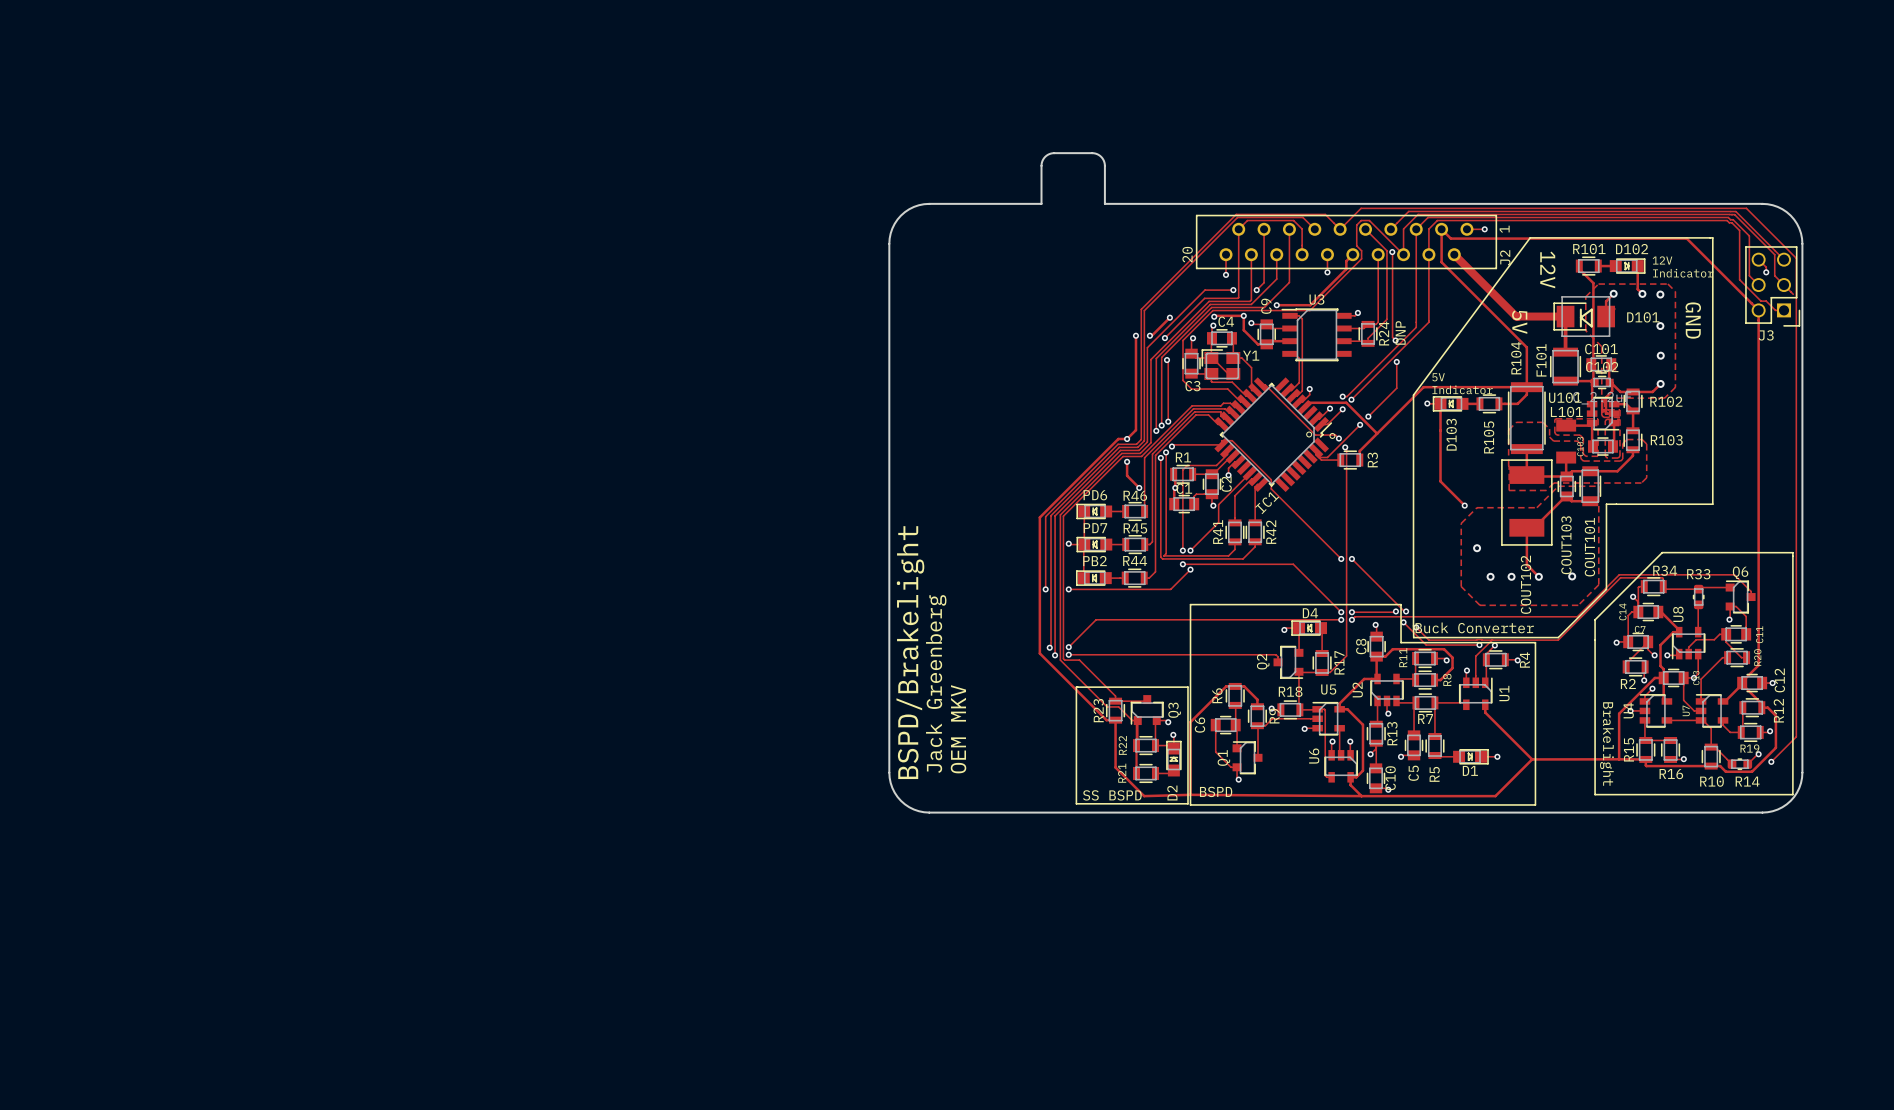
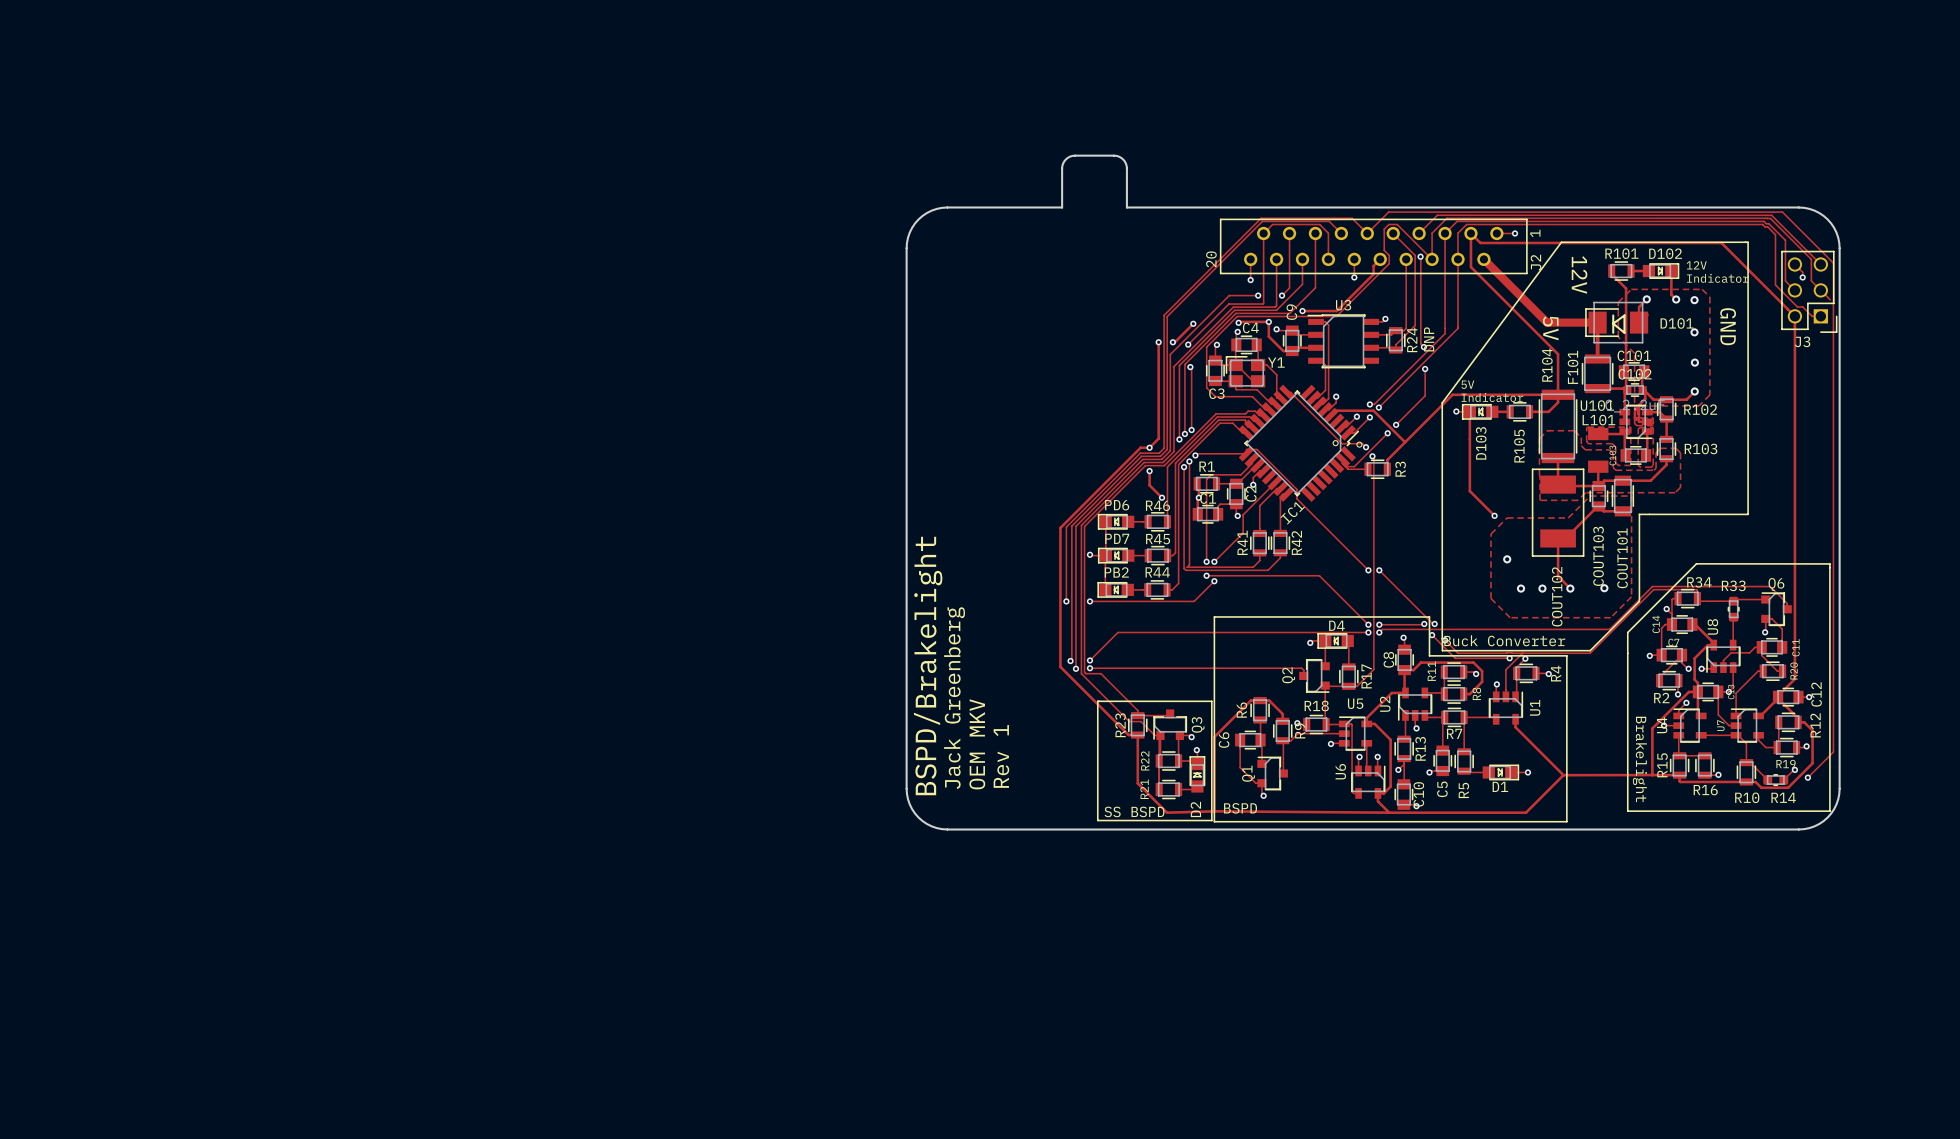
text: none -> Rev 1 (1001, 756)

